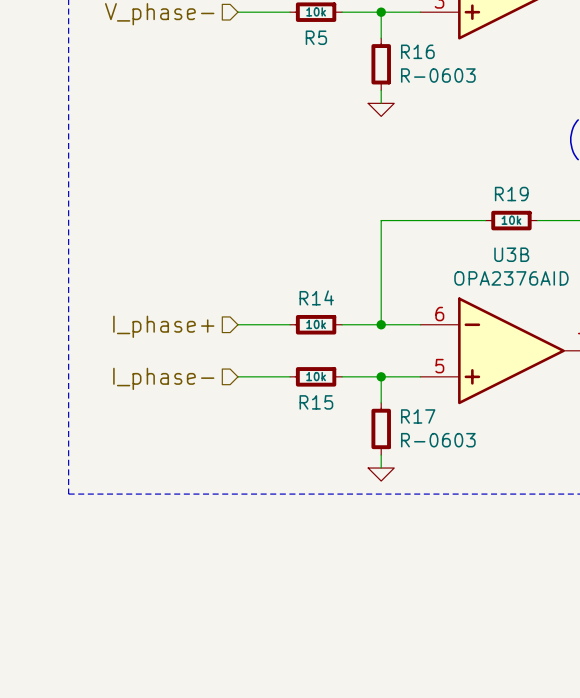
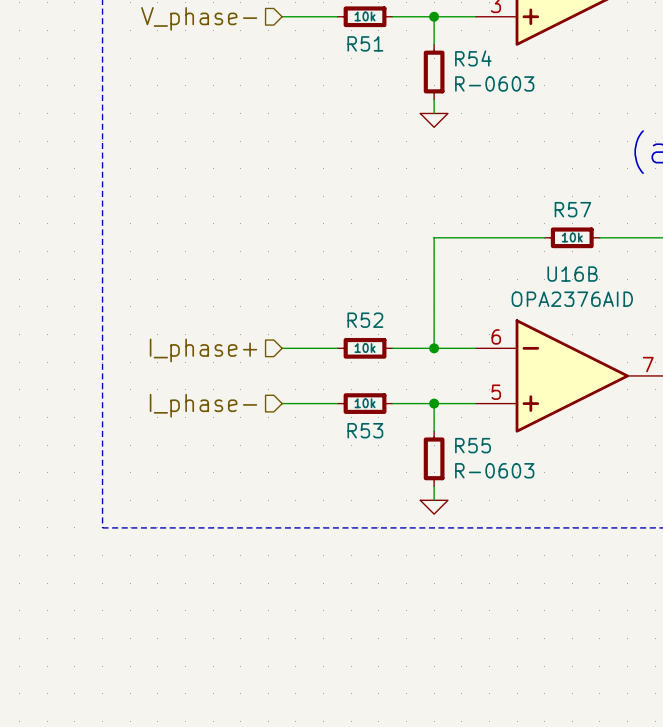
R5 name: R5 (316, 37) -> R51 (365, 43)
R16 name: R16 (417, 51) -> R54 (473, 58)
R19 name: R19 (511, 194) -> R57 (572, 209)
U3B name: U3B (511, 254) -> U16B (572, 274)
R14 name: R14 (316, 297) -> R52 (365, 320)
R15 name: R15 (316, 402) -> R53 (365, 430)
R17 name: R17 (418, 416) -> R55 (473, 445)

